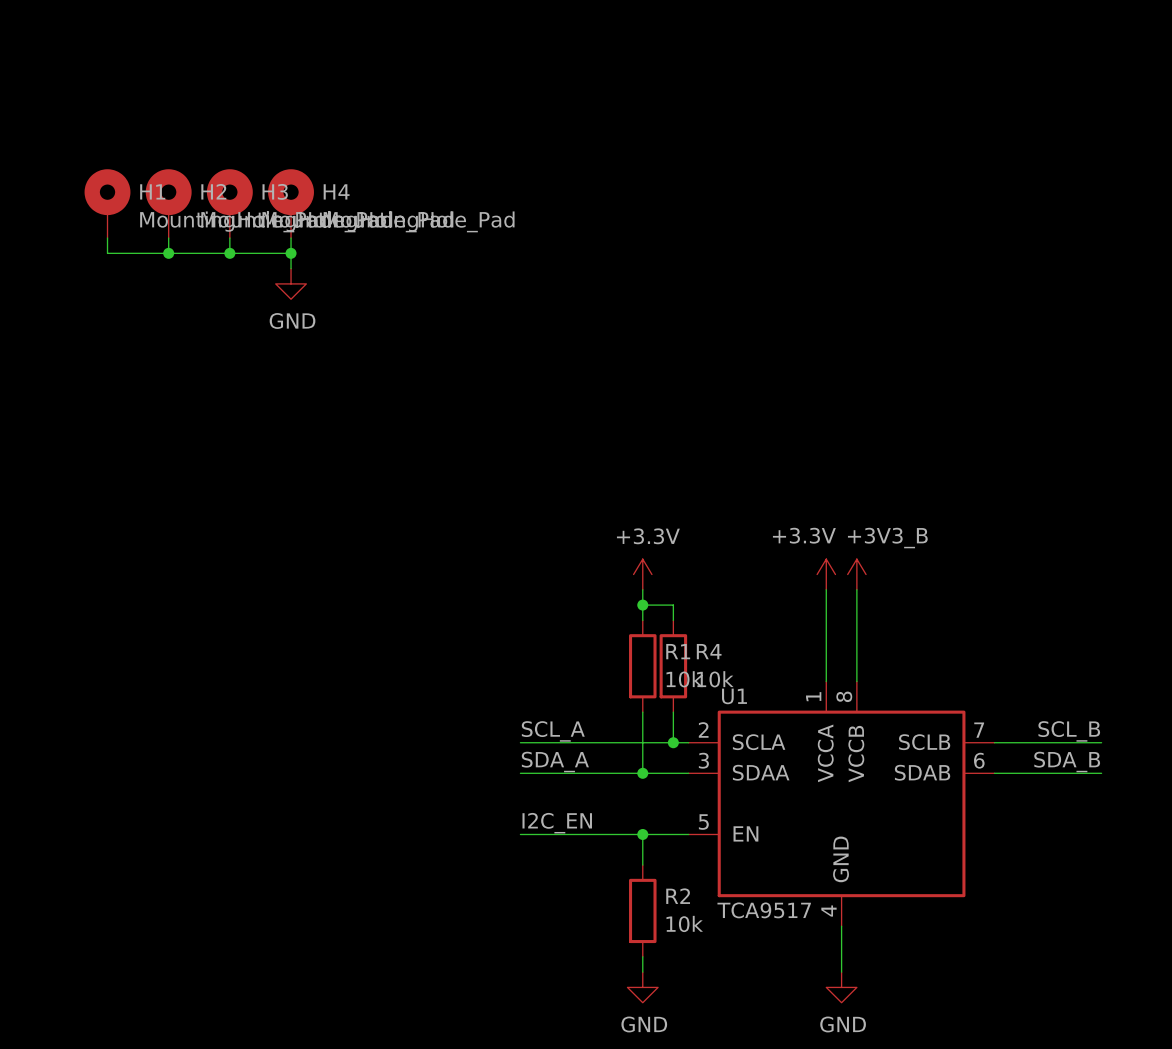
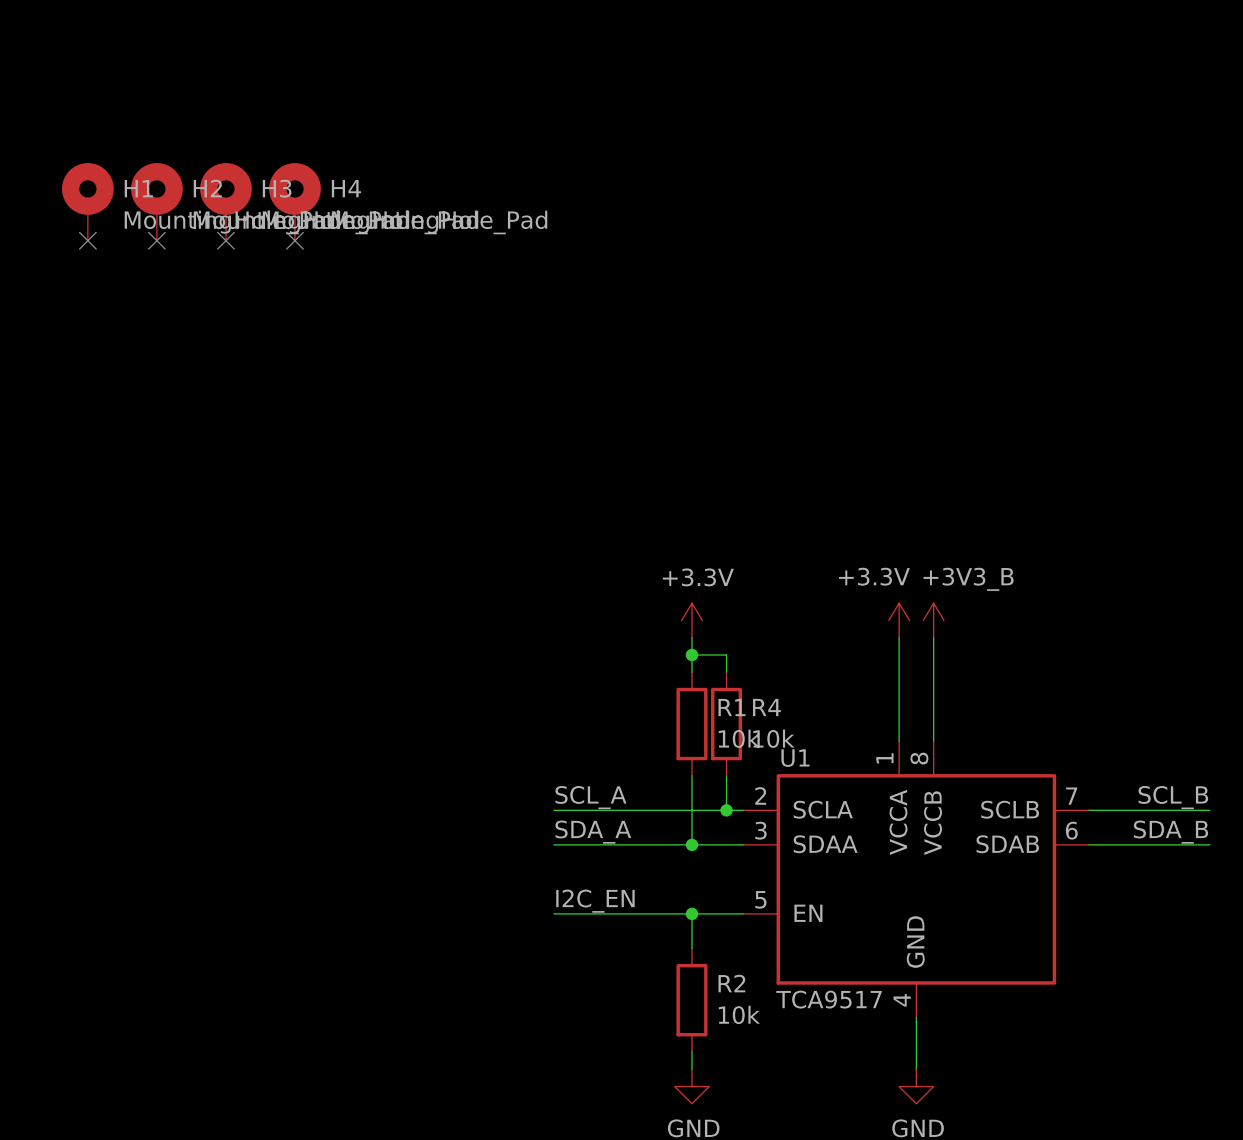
wire: (107, 238) (107, 253) (291, 253) -> none
no-connect mark: none -> (87, 240)
wire: (168, 238) (168, 253) -> none
no-connect mark: none -> (156, 240)
wire: (229, 238) (229, 253) -> none
no-connect mark: none -> (225, 240)
wire: (291, 238) (291, 268) -> none
no-connect mark: none -> (295, 240)
junction: (168, 253) -> none
junction: (229, 253) -> none
junction: (291, 253) -> none
power symbol: GND (291, 283) -> none

